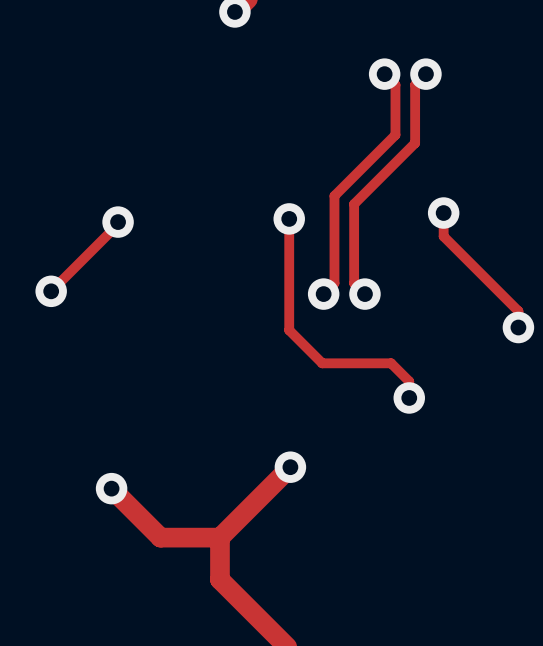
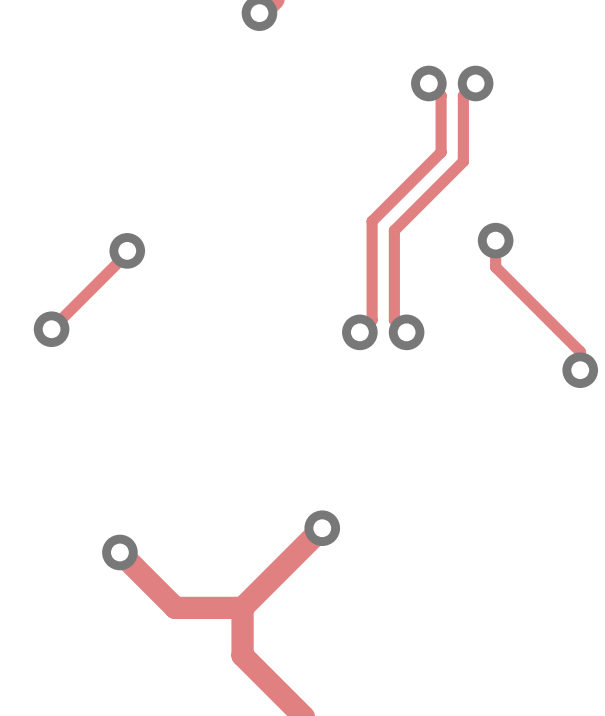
track: (289, 218) (289, 330) (322, 363) (391, 363) (409, 381) (409, 397) -> none
via: (289, 218) -> none
via: (409, 397) -> none

